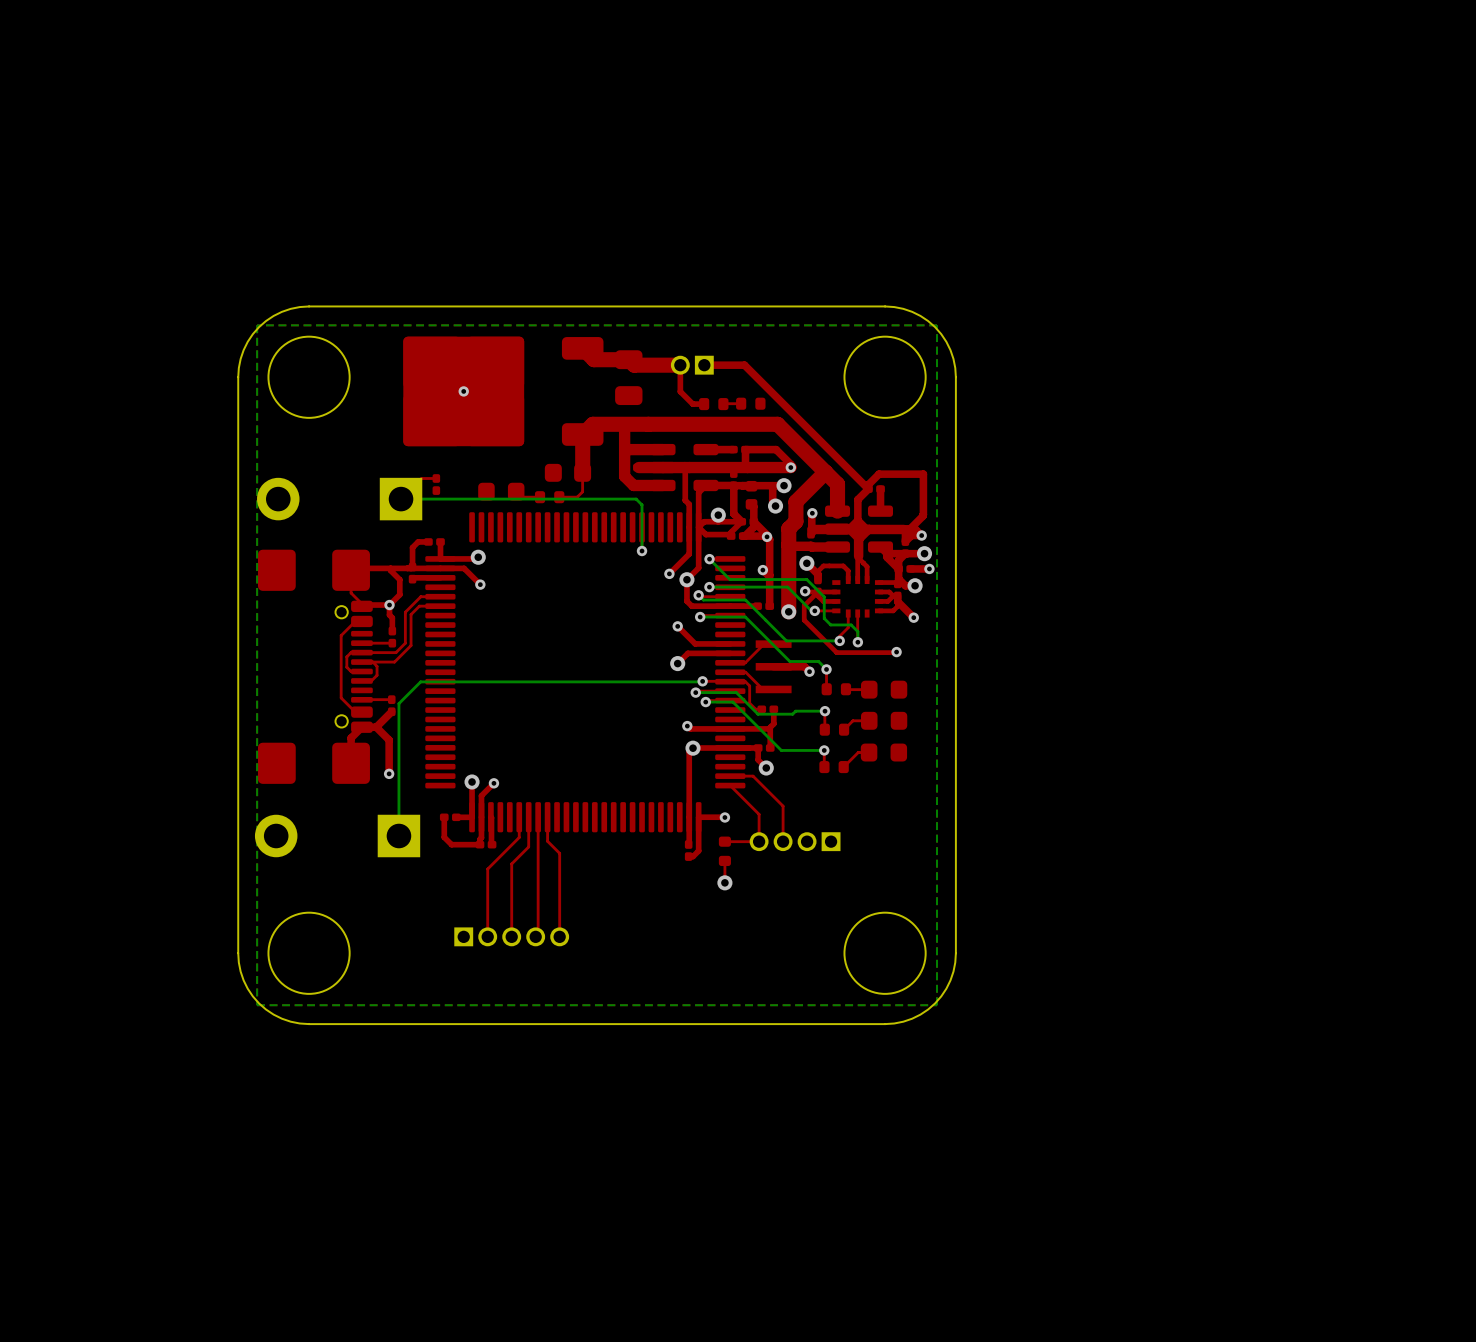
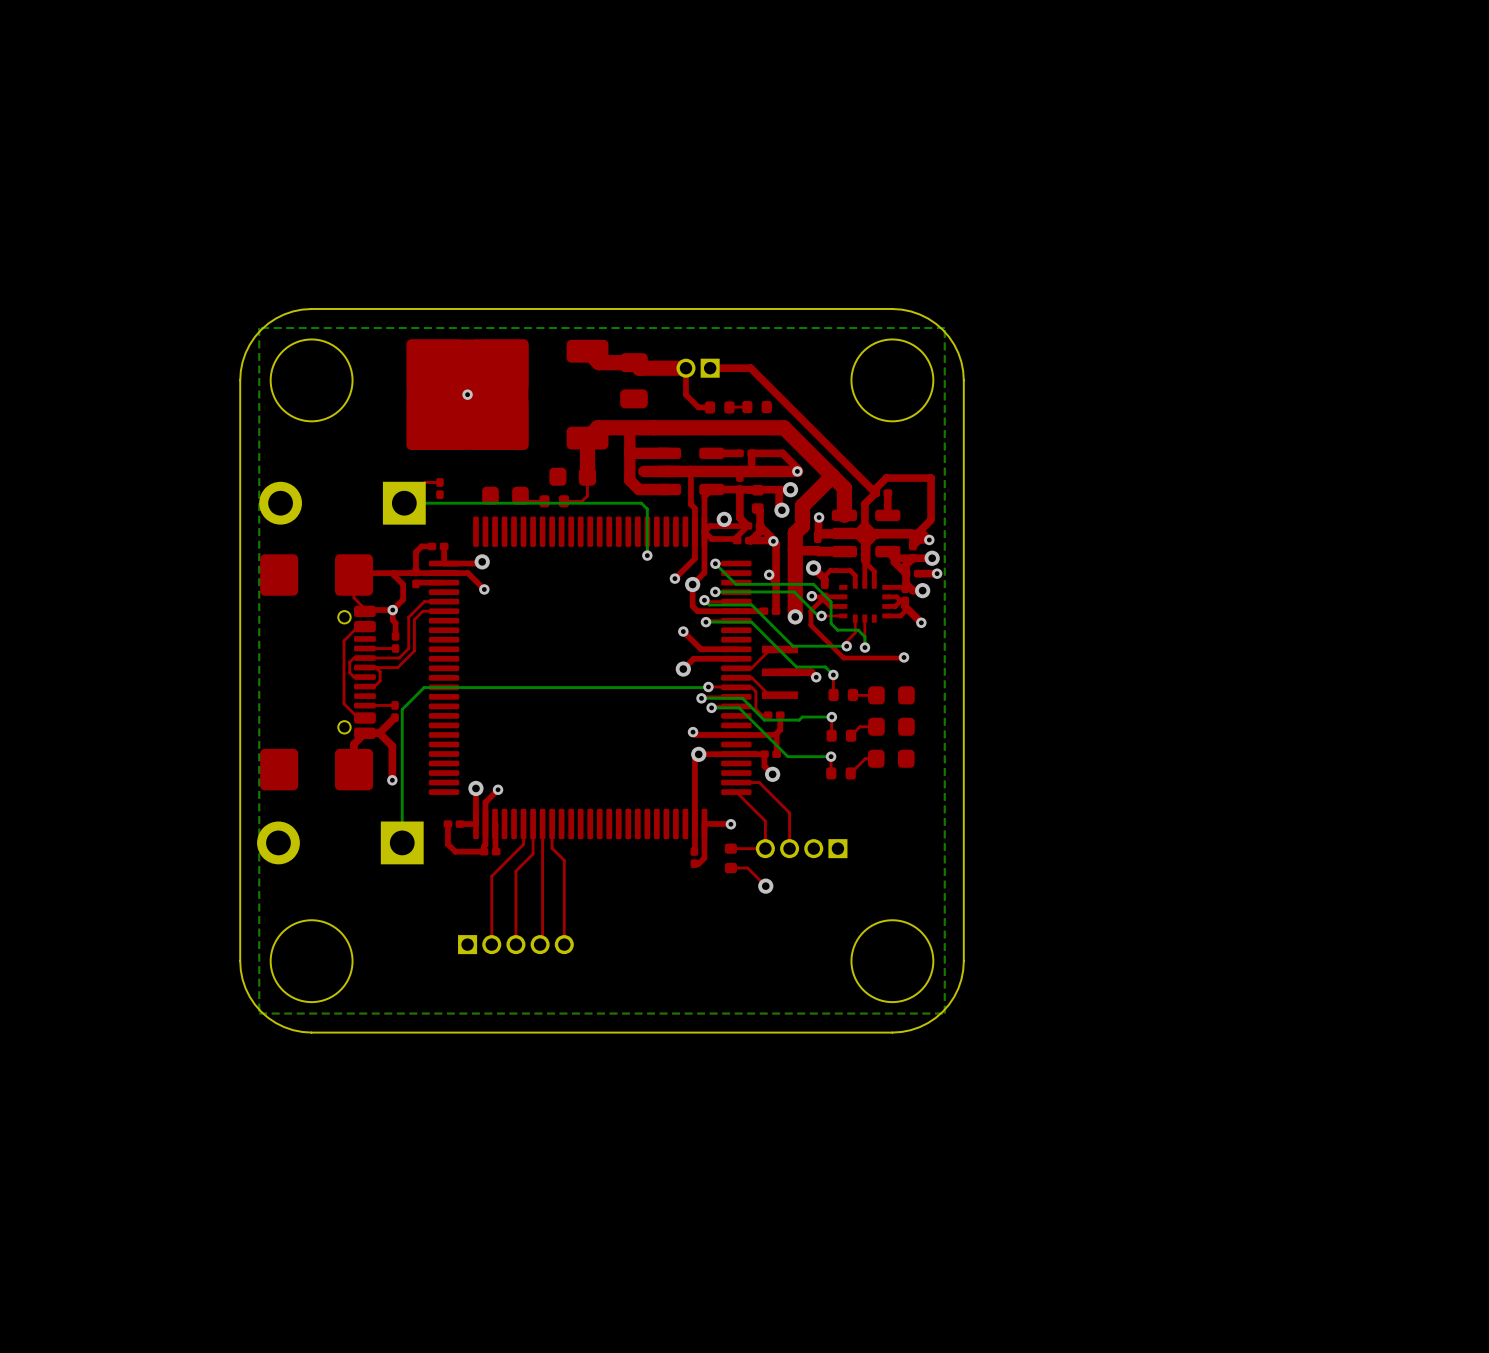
top track: (724, 860) (724, 882) -> (730, 868) (747, 868) (765, 886)
via position: (724, 882) -> (765, 886)

